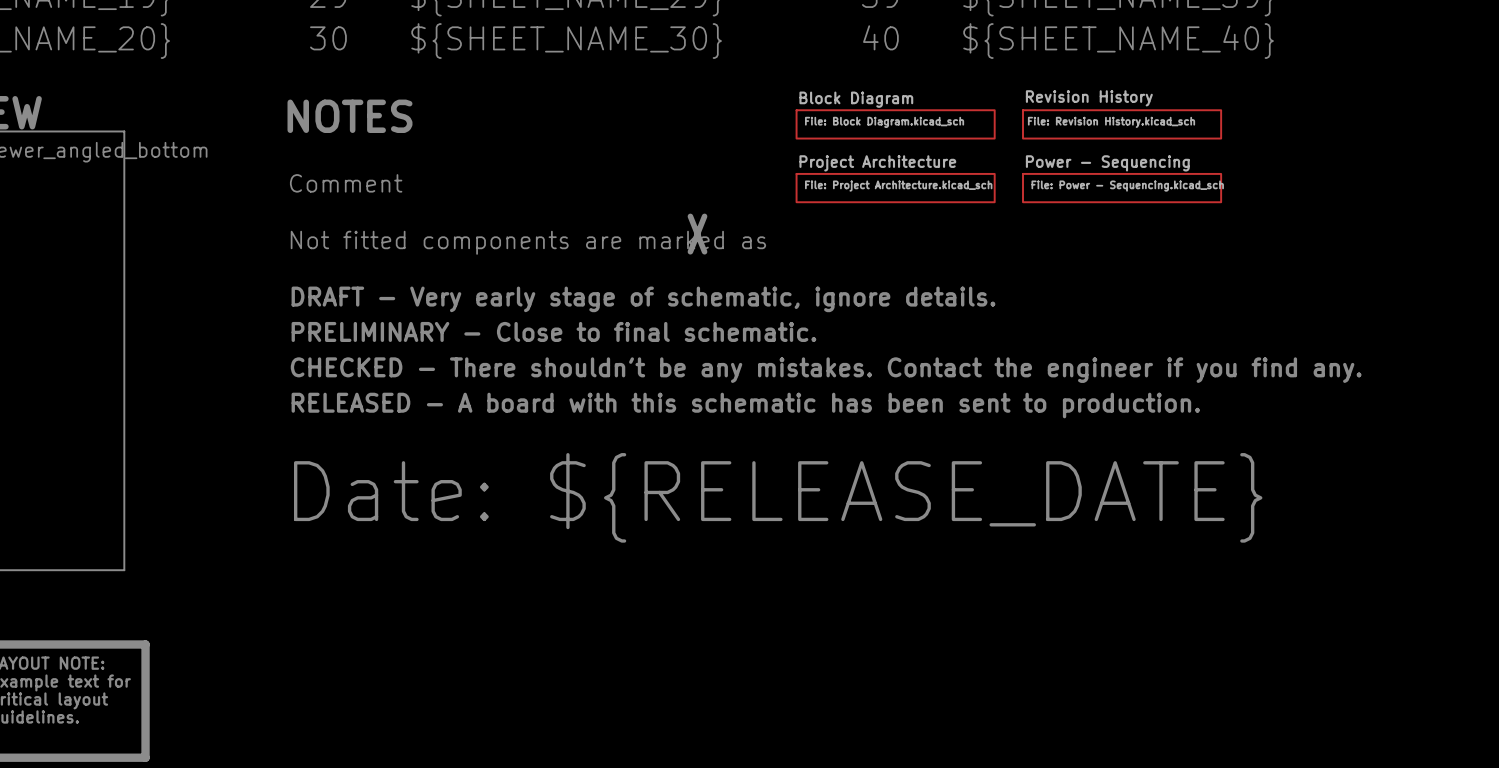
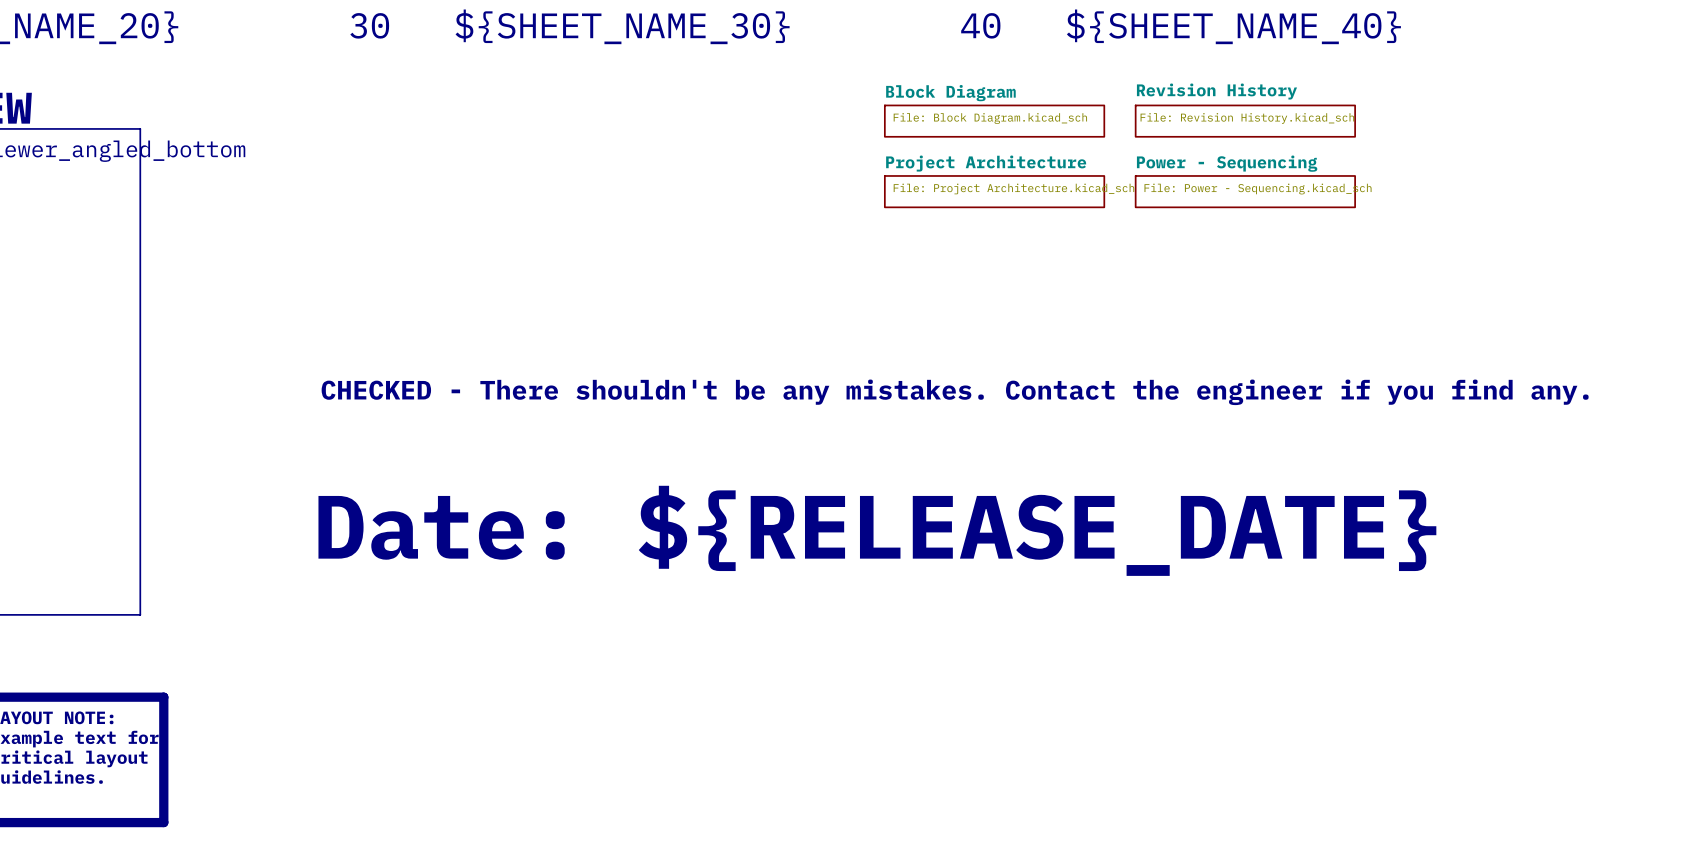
text: NOTES (349, 116) -> none
text: Comment (346, 183) -> none
line: (690, 216) (704, 251) -> none
line: (704, 216) (690, 251) -> none
text: Not fitted components are marked as (528, 242) -> none
text: DRAFT - Very early stage of schematic, ignore details. (643, 299) -> none
text: PRELIMINARY - Close to final schematic. (553, 331) -> none
text: RELEASED - A board with this schematic has been sent to production. (745, 405) -> none

